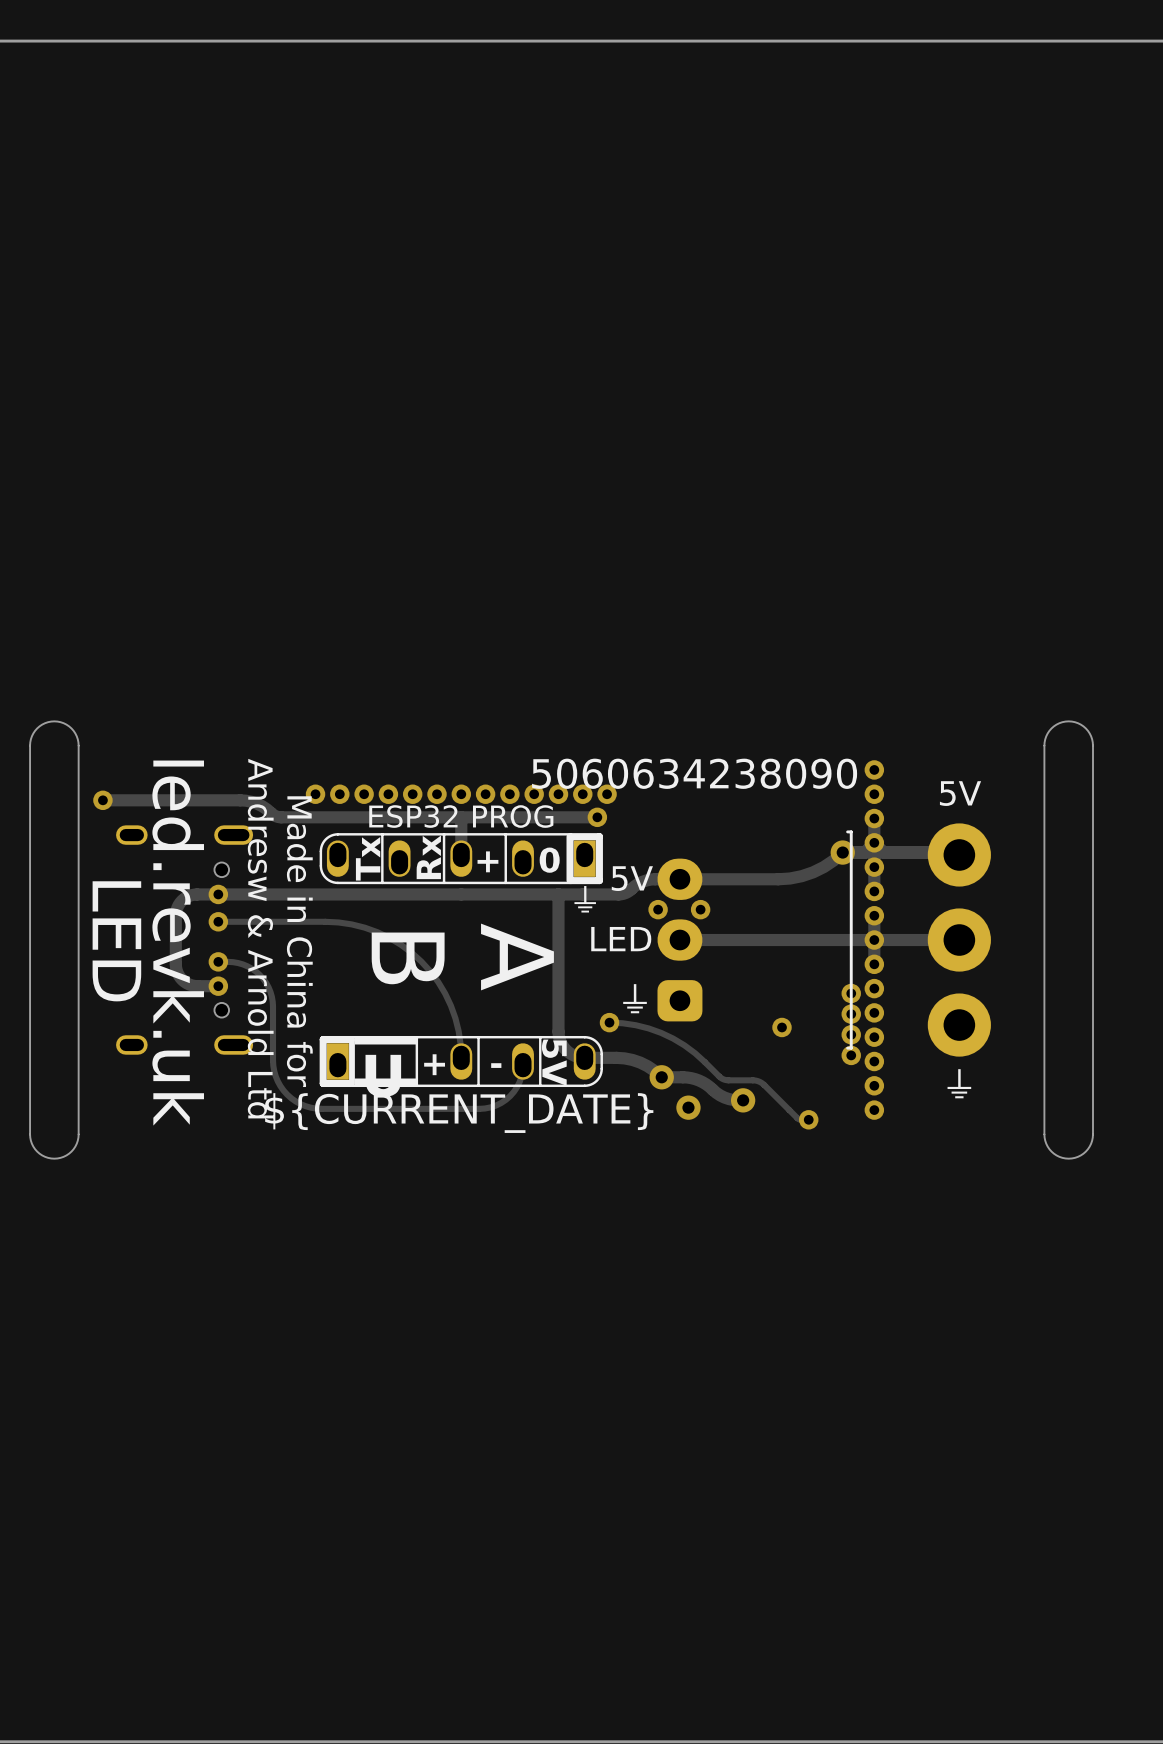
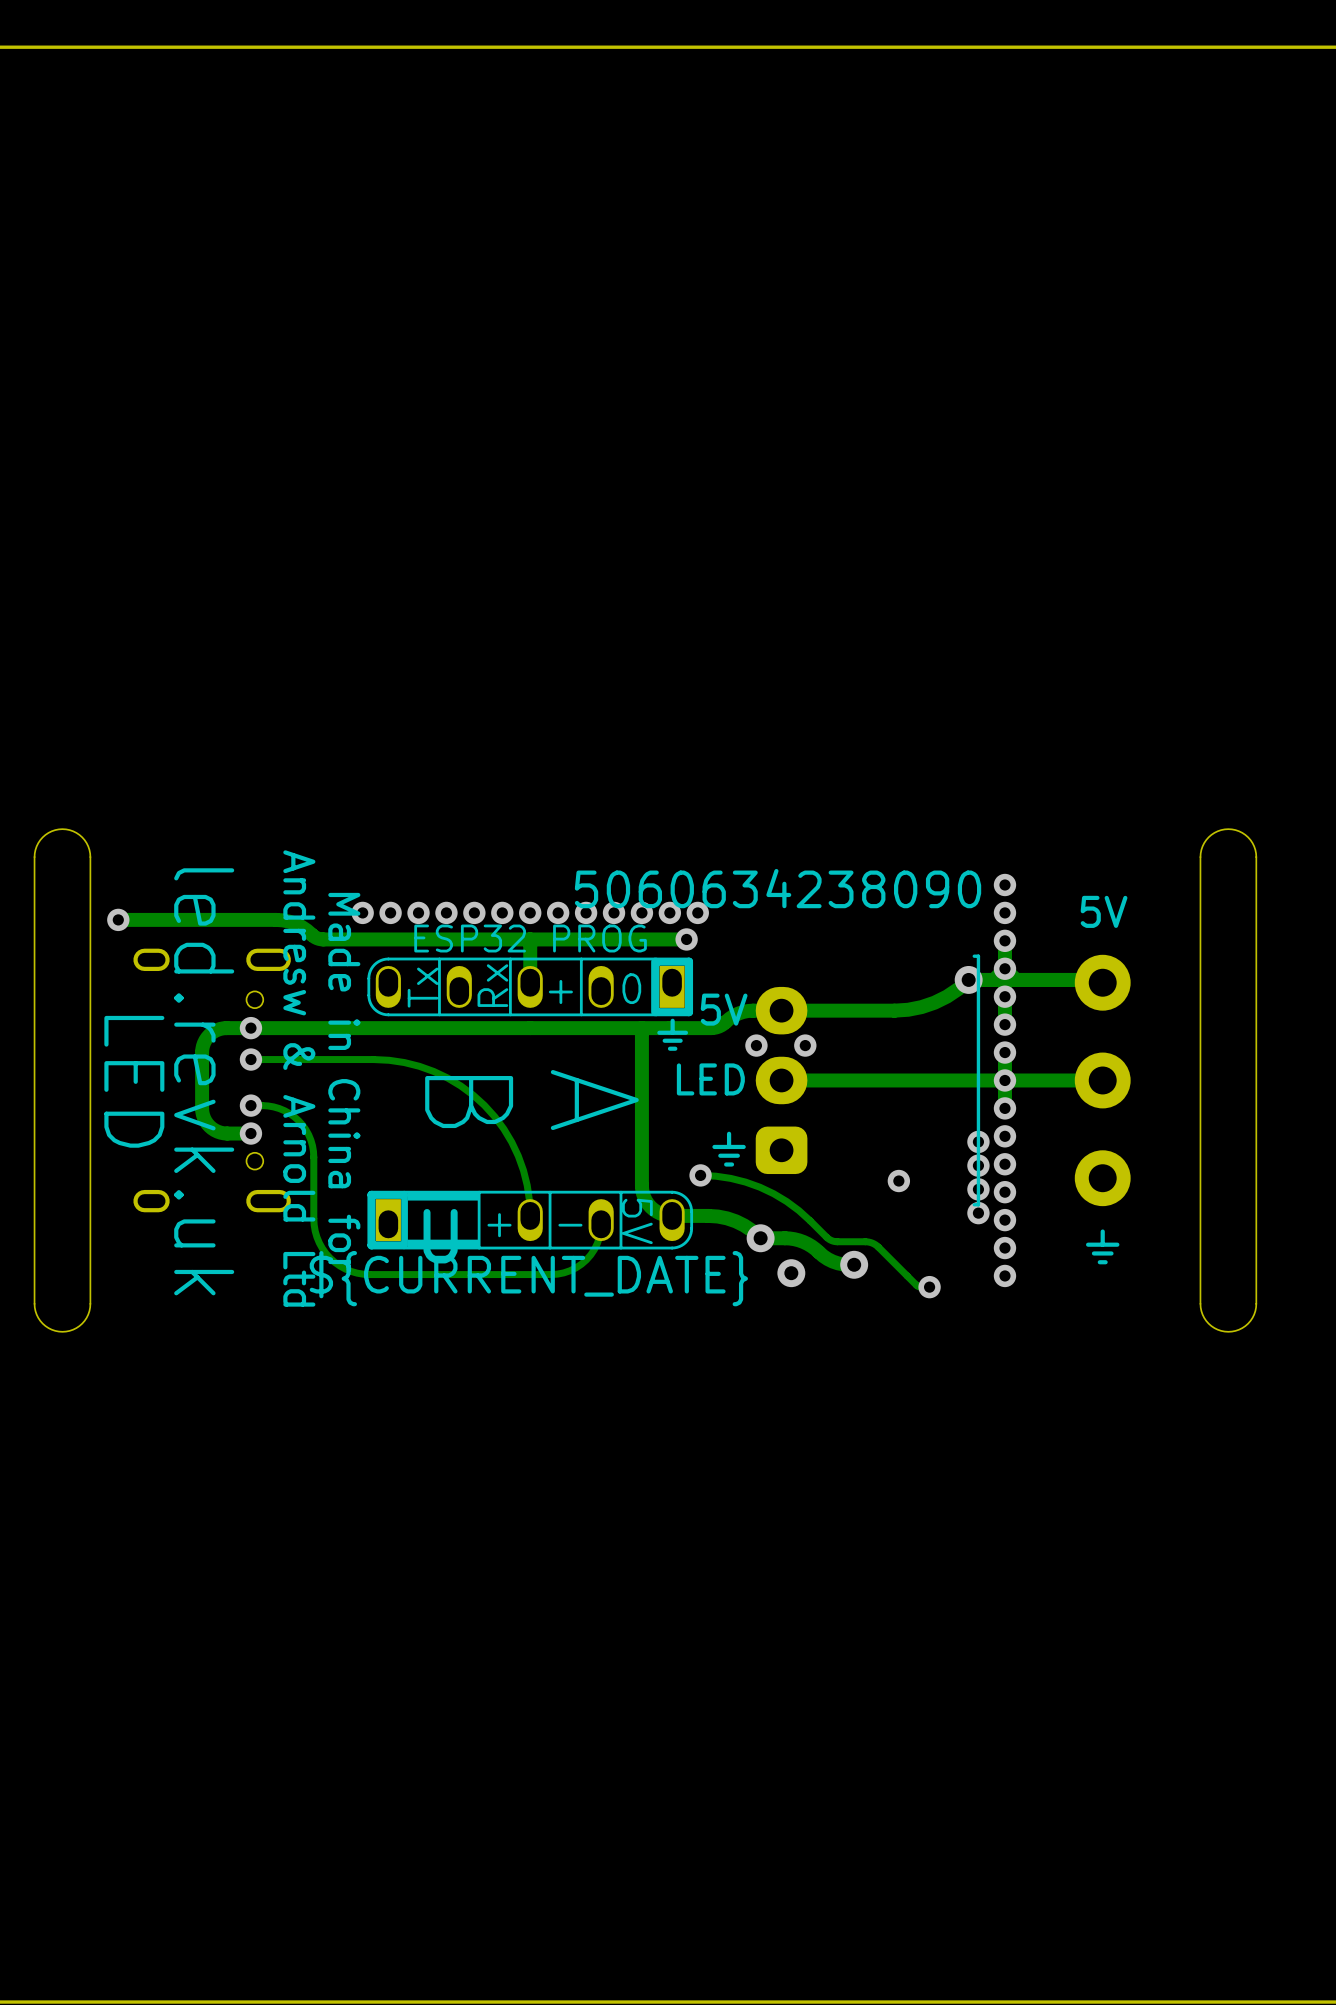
part footprint: [927, 823, 991, 1057] -> [1074, 954, 1131, 1207]

